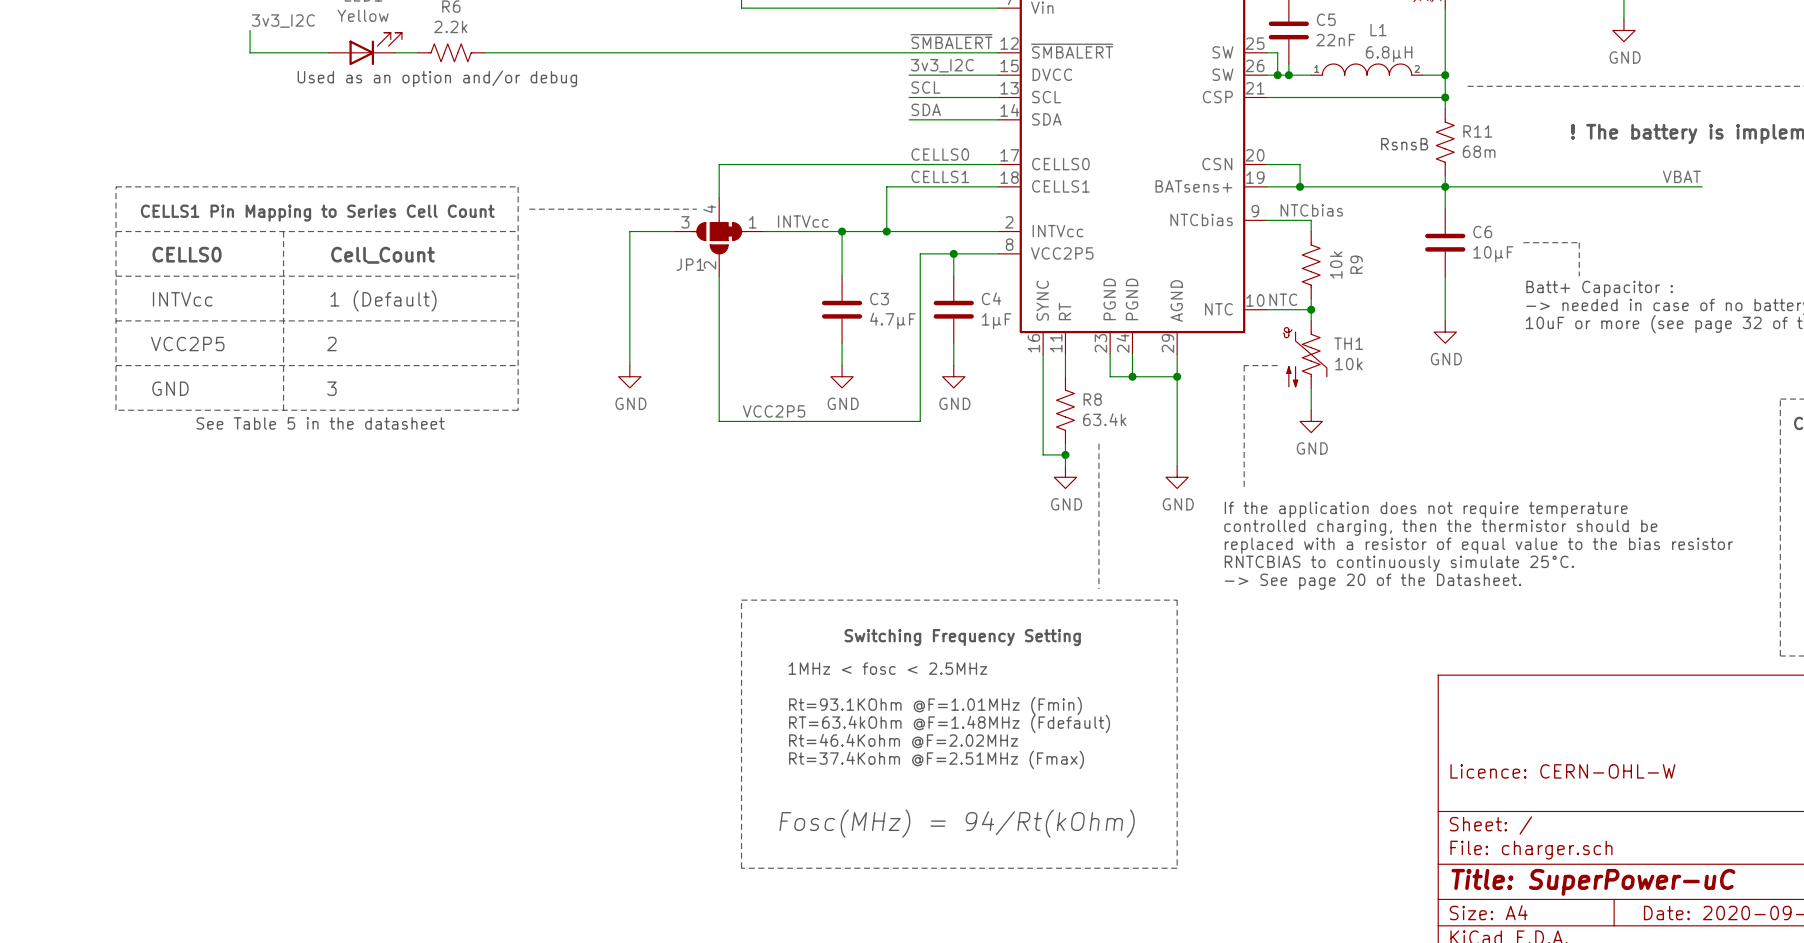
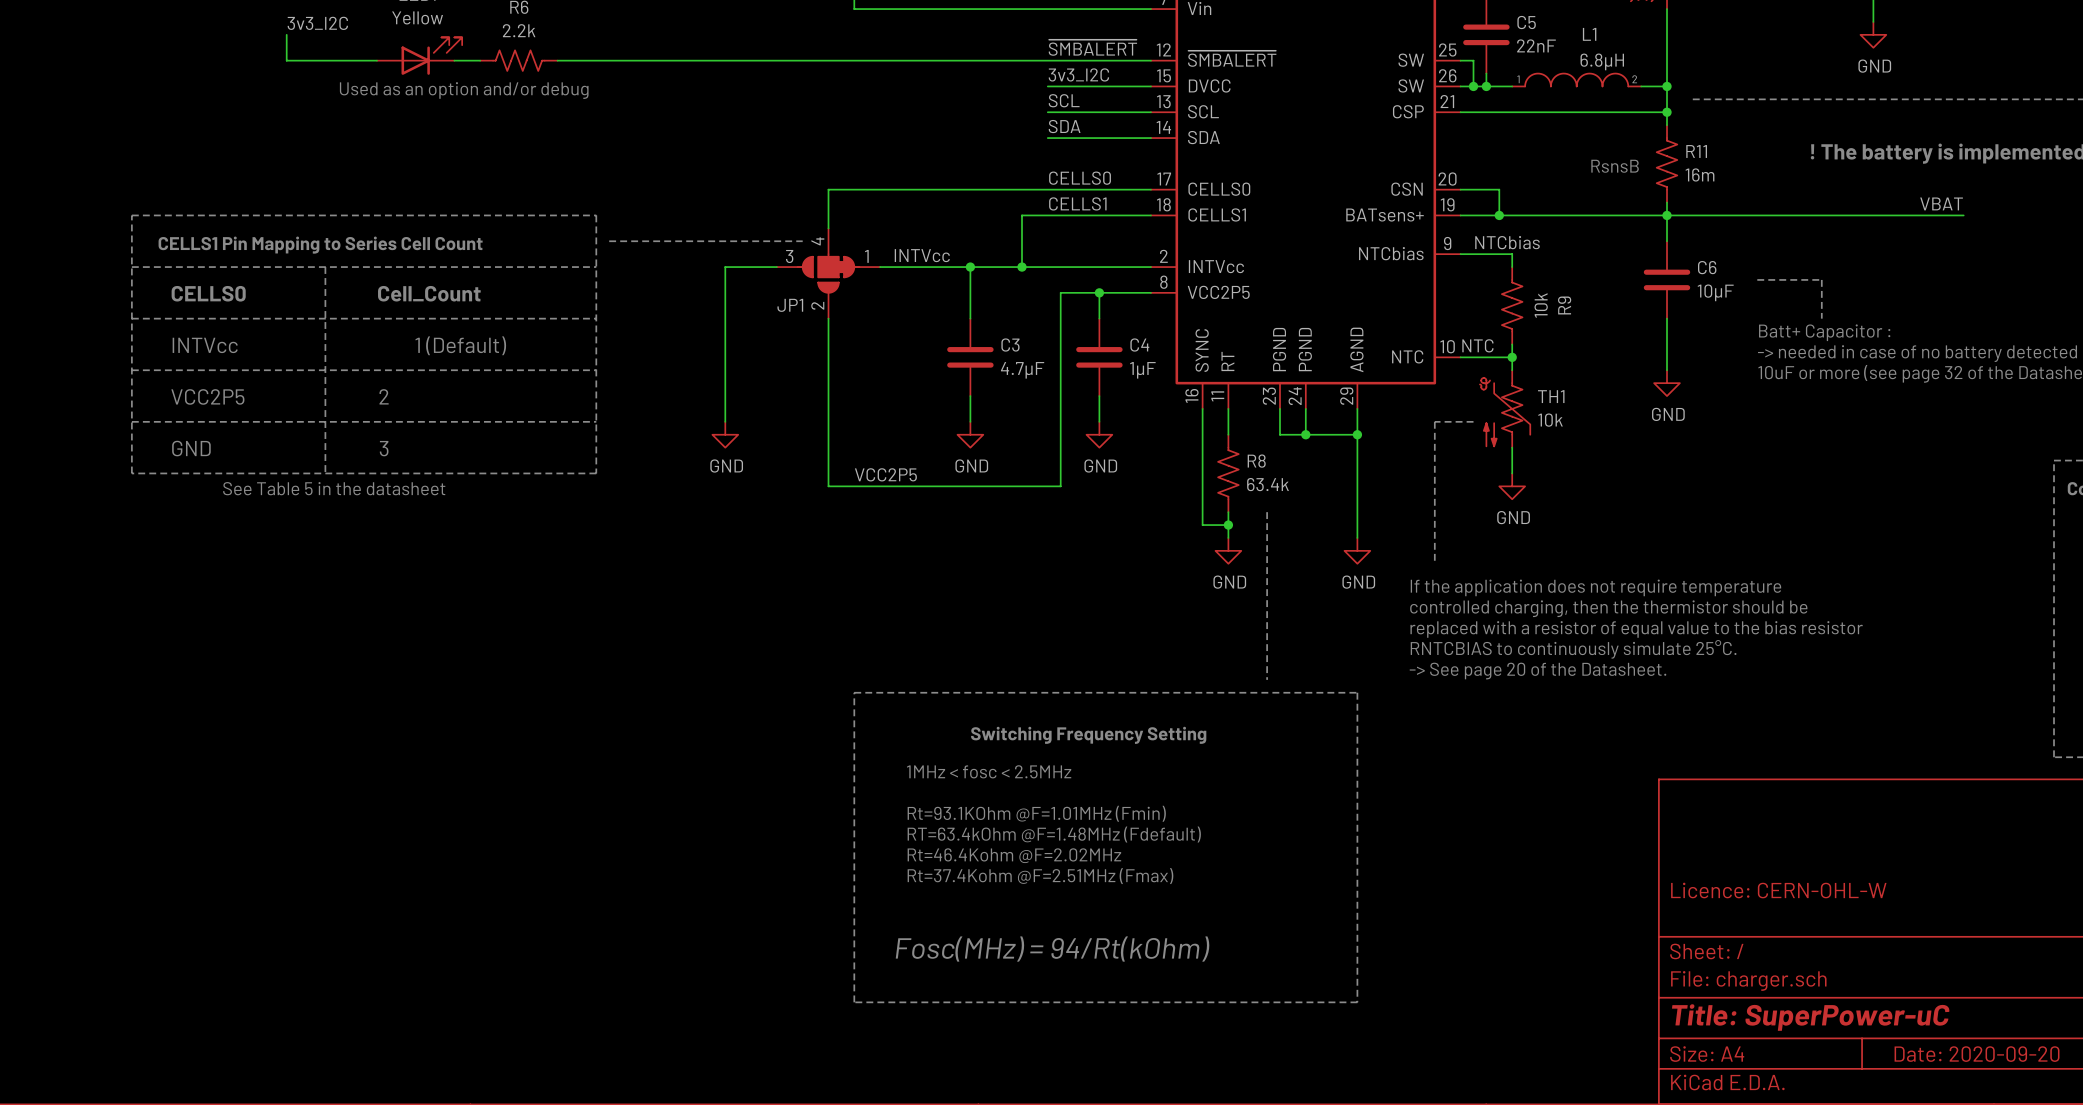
R11 value: 68m (1479, 151) -> 16m (1700, 174)

